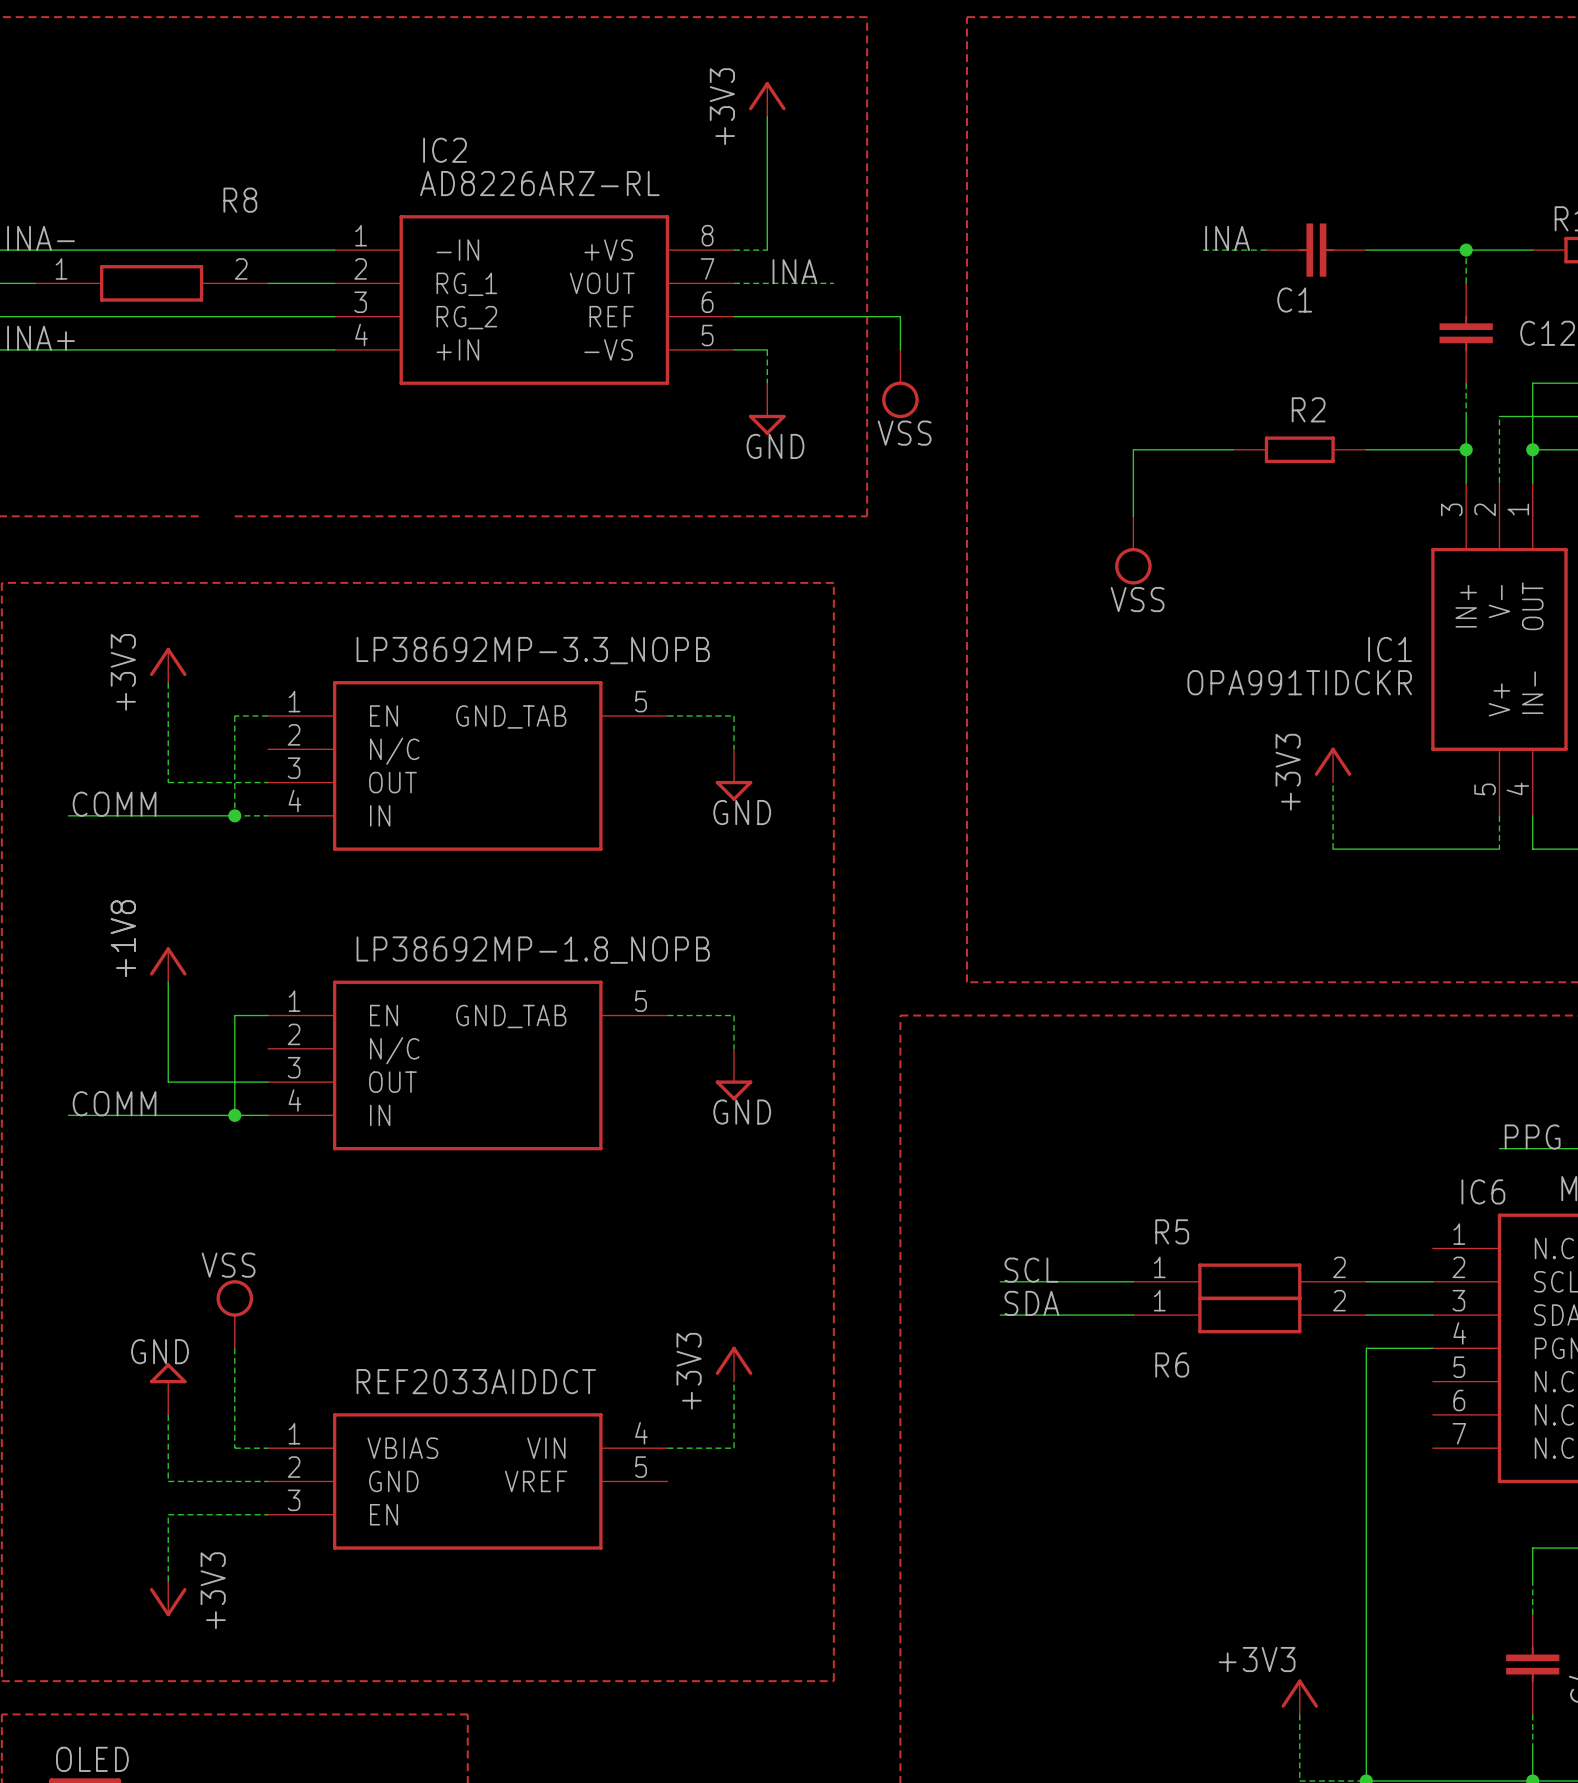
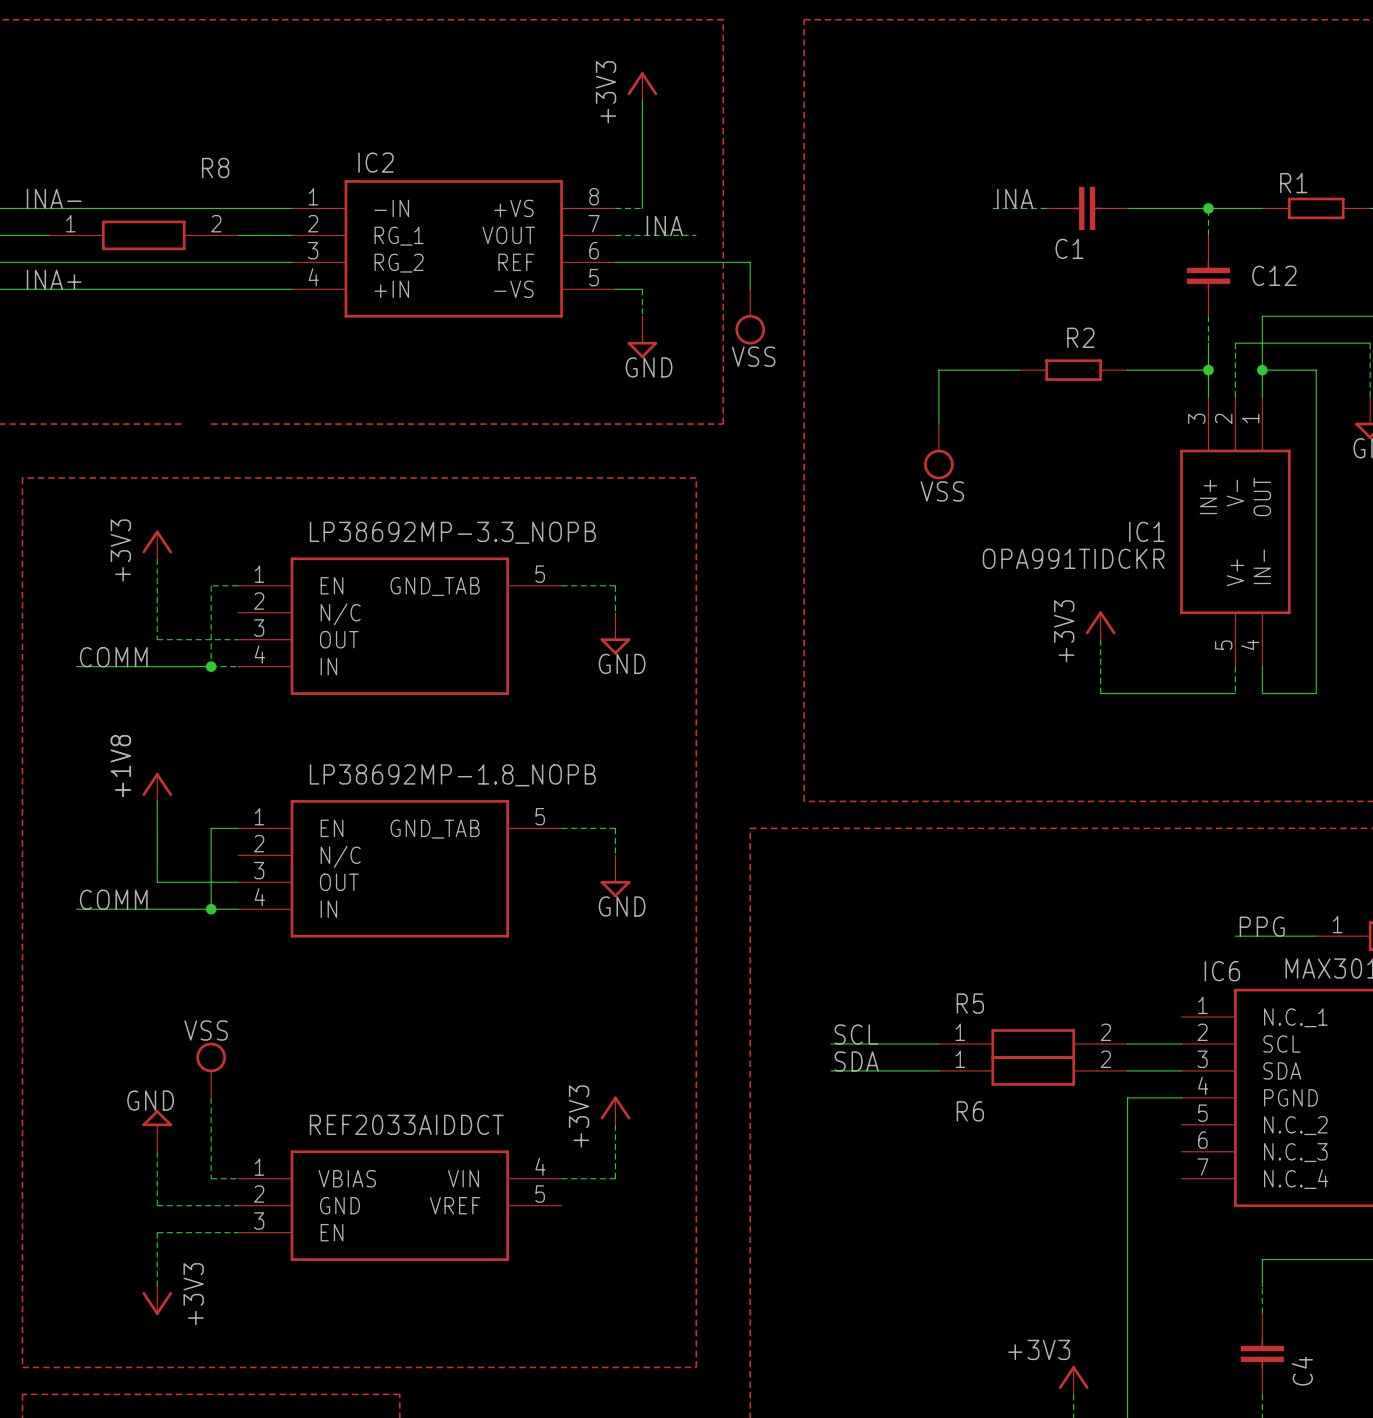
IC2 name position: IC2 (445, 150) -> IC2 (376, 162)
IC2 value: AD8226ARZ-RL (539, 183) -> none

